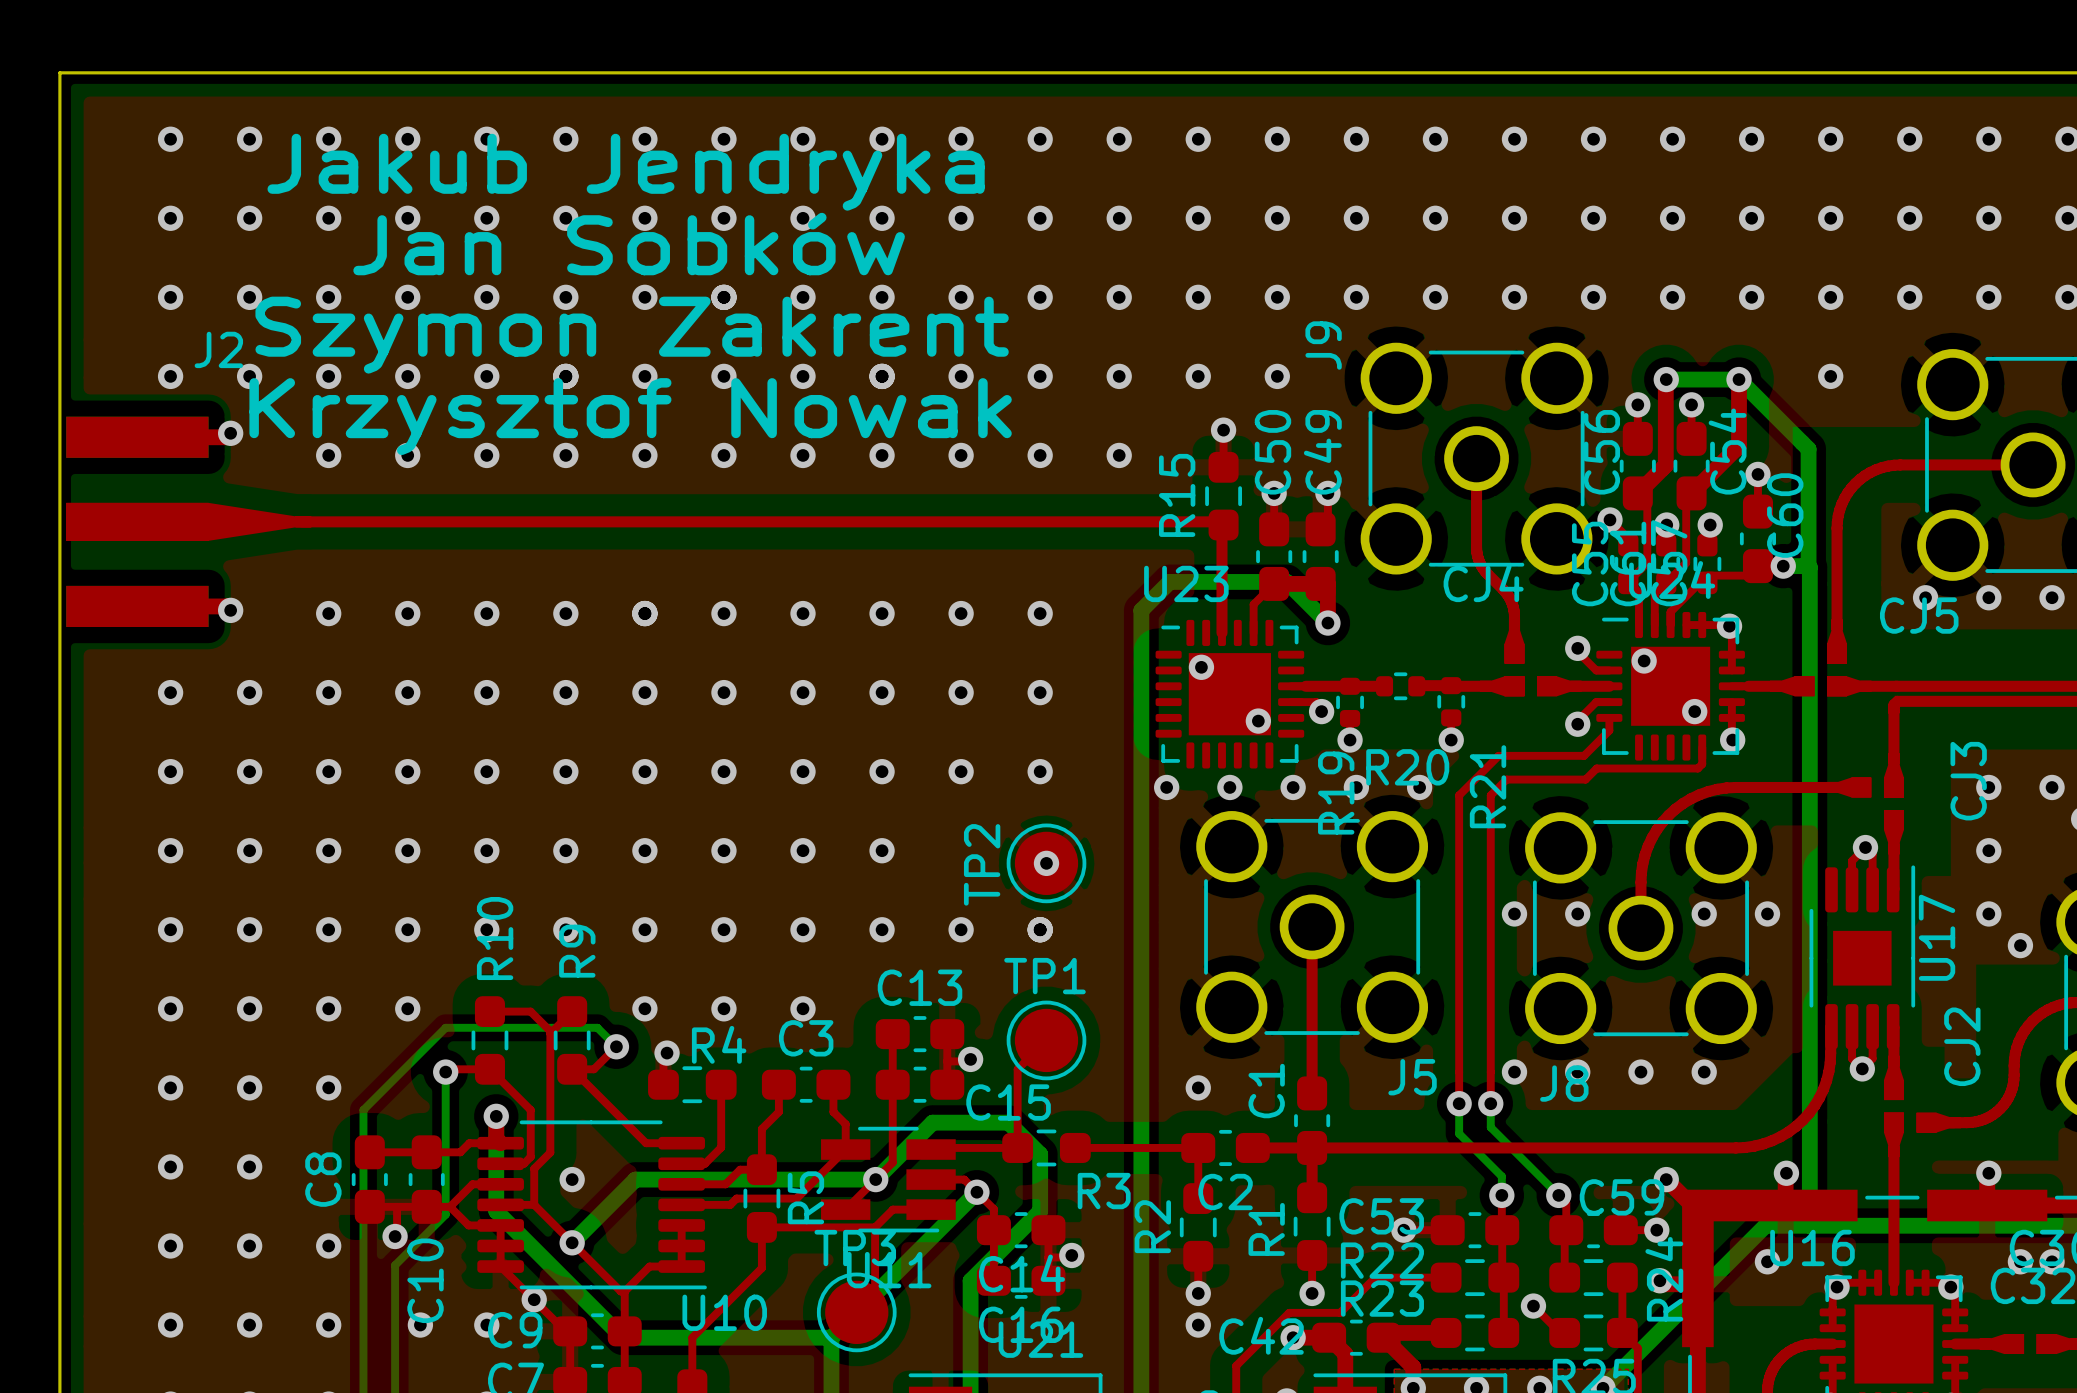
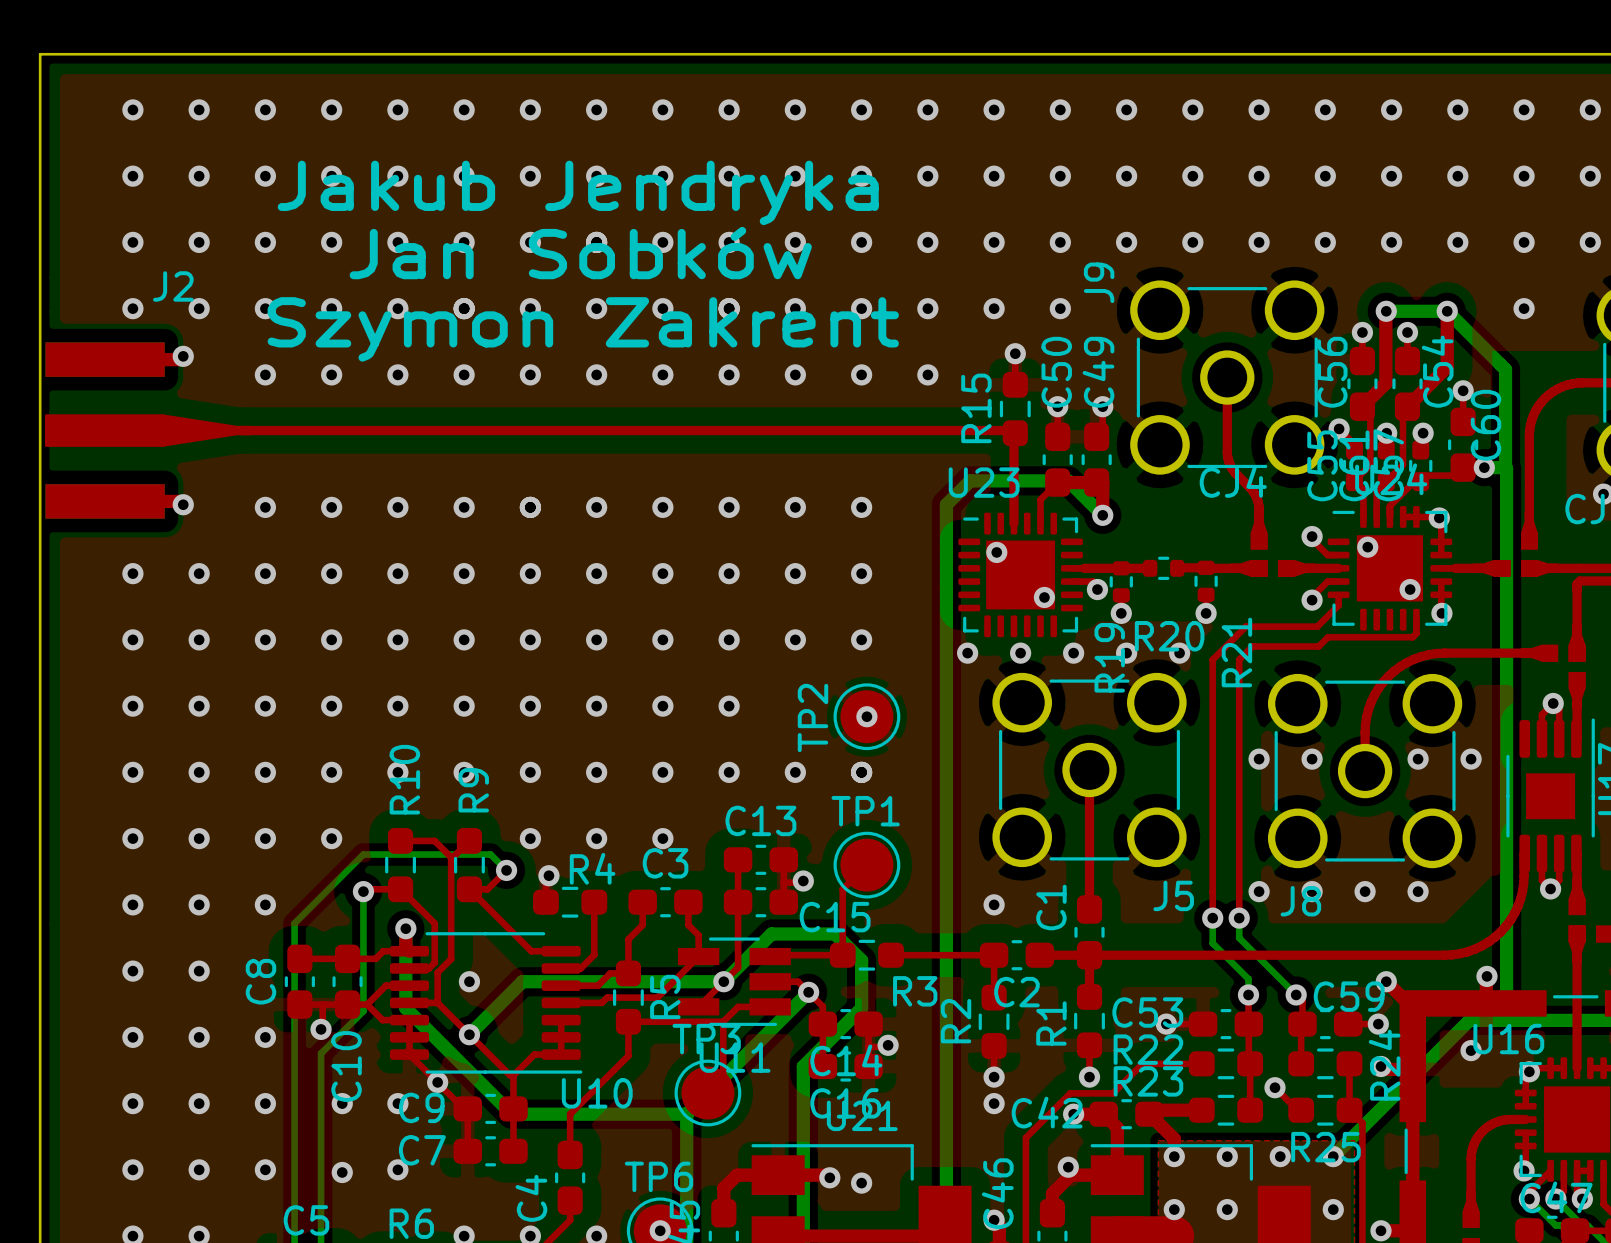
text position: Jakub Jendryka (626, 172) -> Jakub Jendryka (578, 192)
text position: Jan Sobków (629, 244) -> Jan Sobków (580, 253)
text position: Szymon Zakrent (632, 335) -> Szymon Zakrent (583, 329)
text: Krzysztof Nowak (630, 416) -> none

